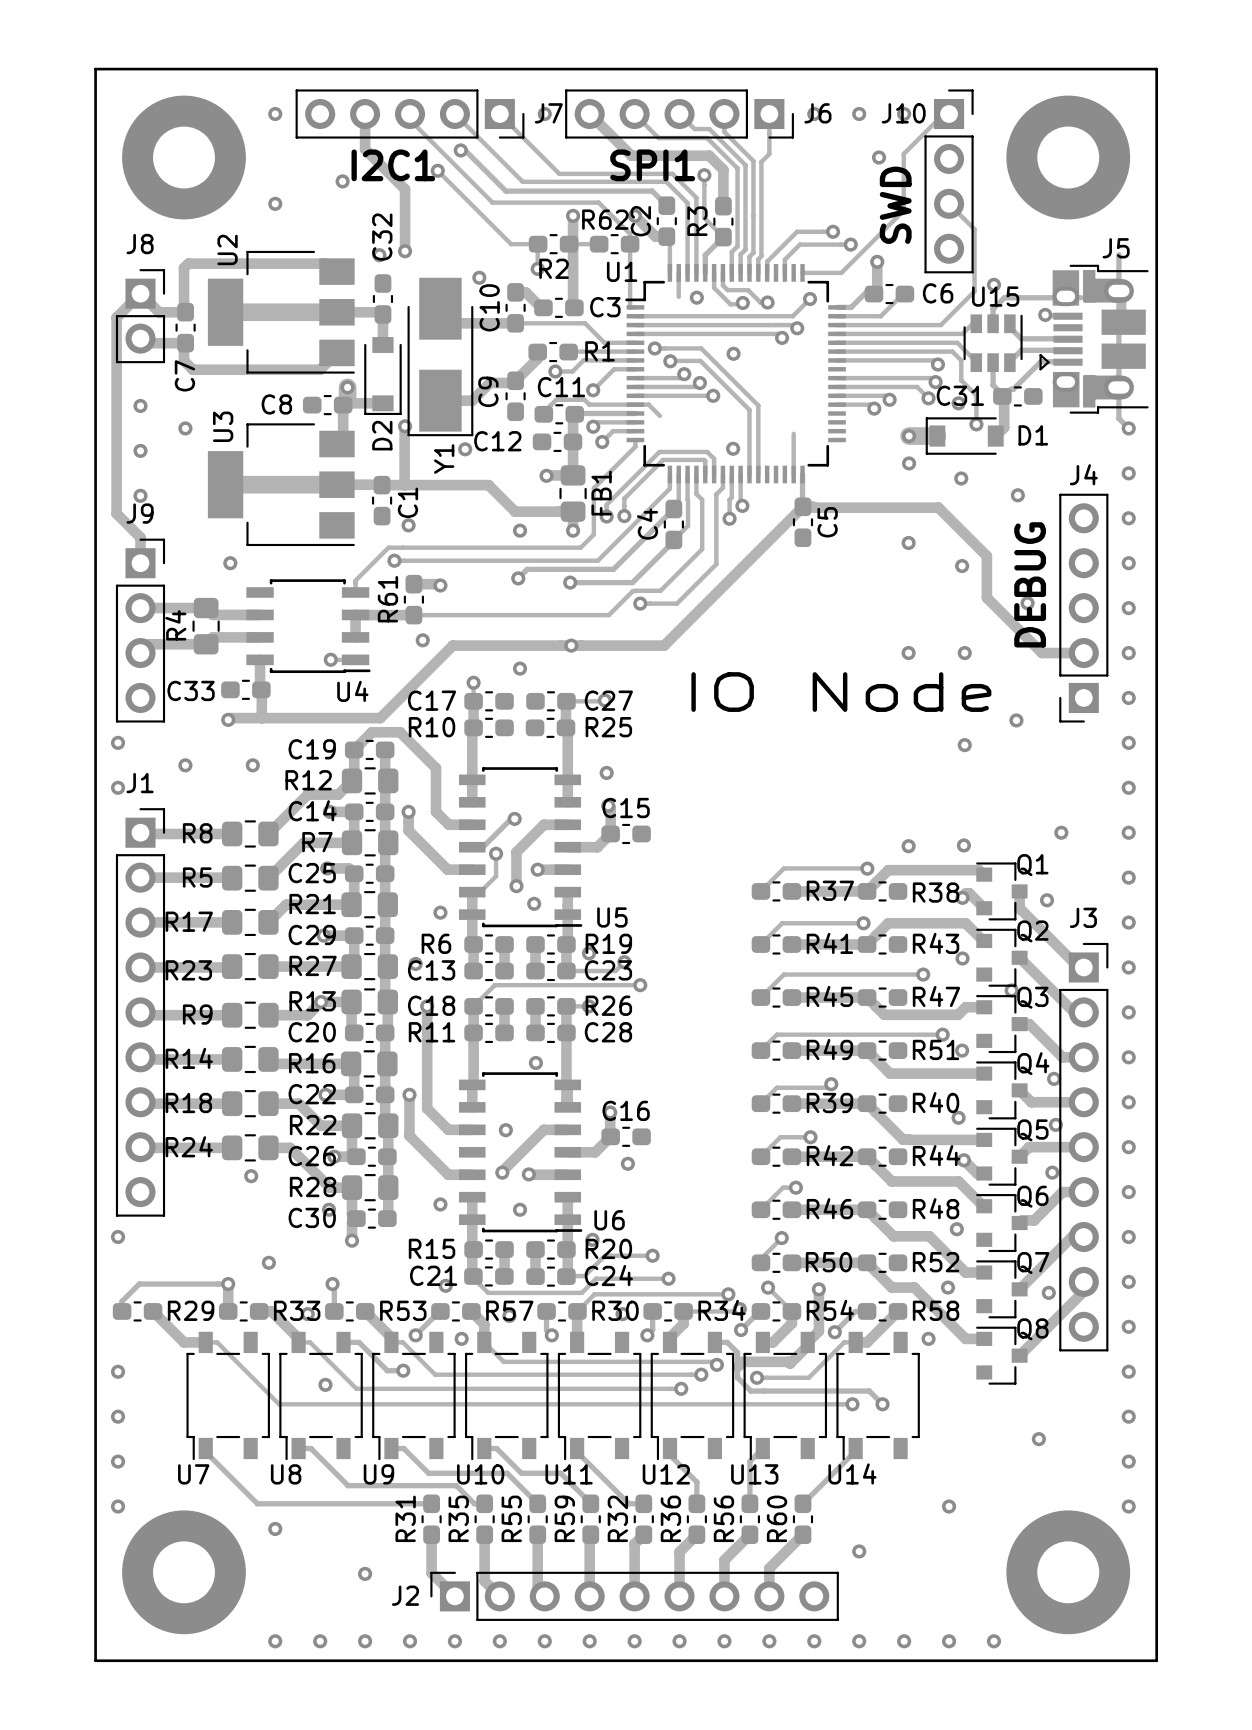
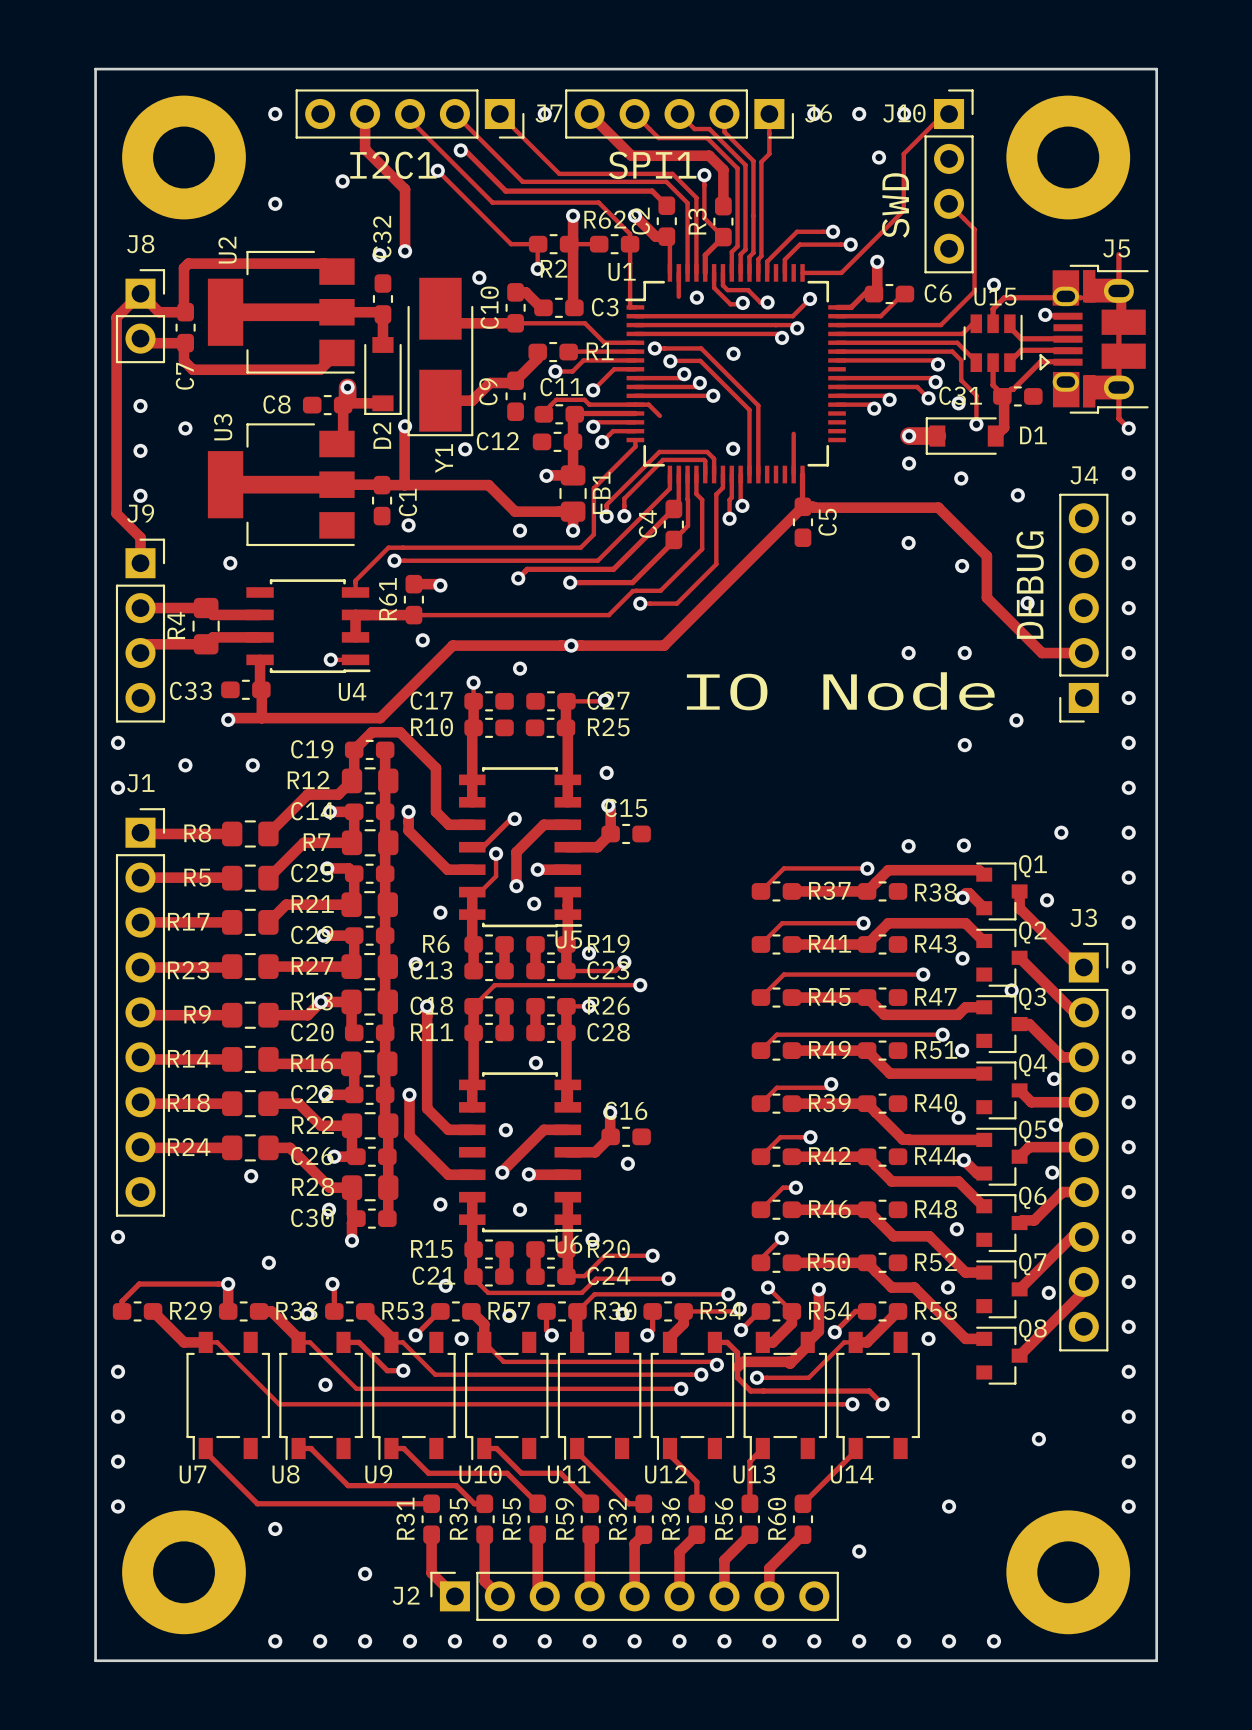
U5 name position: U5 (612, 917) -> U5 (568, 939)
U6 name position: U6 (609, 1220) -> U6 (568, 1244)

